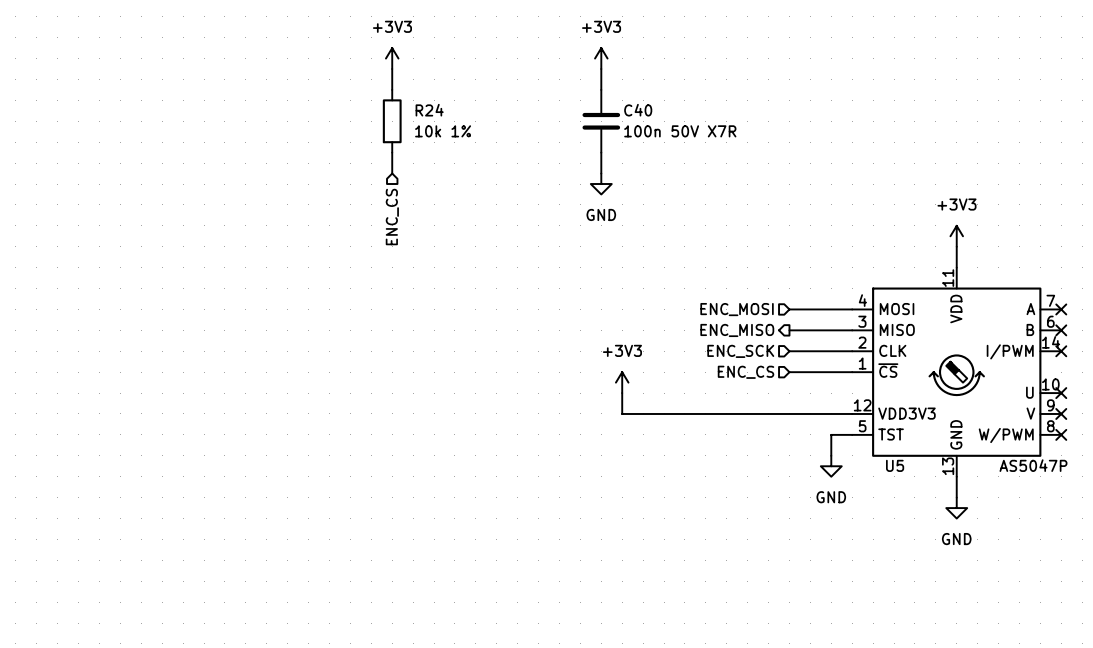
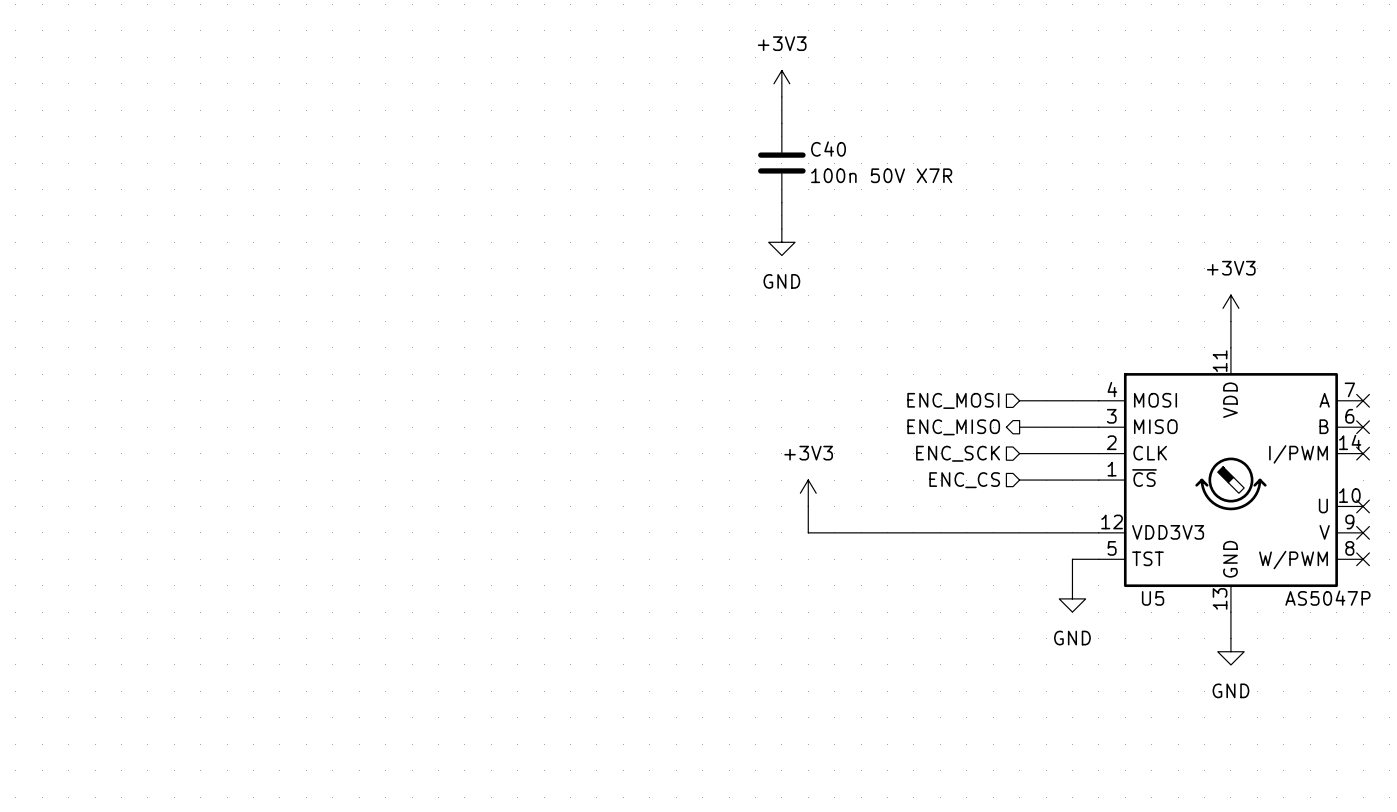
power symbol: +3V3 (392, 58) -> none
wire: (392, 69) (392, 89) -> none
R24: 10k 1% (392, 121) -> none
wire: (392, 152) (392, 173) -> none
hierarchical label: ENC_CS (392, 217) -> none

